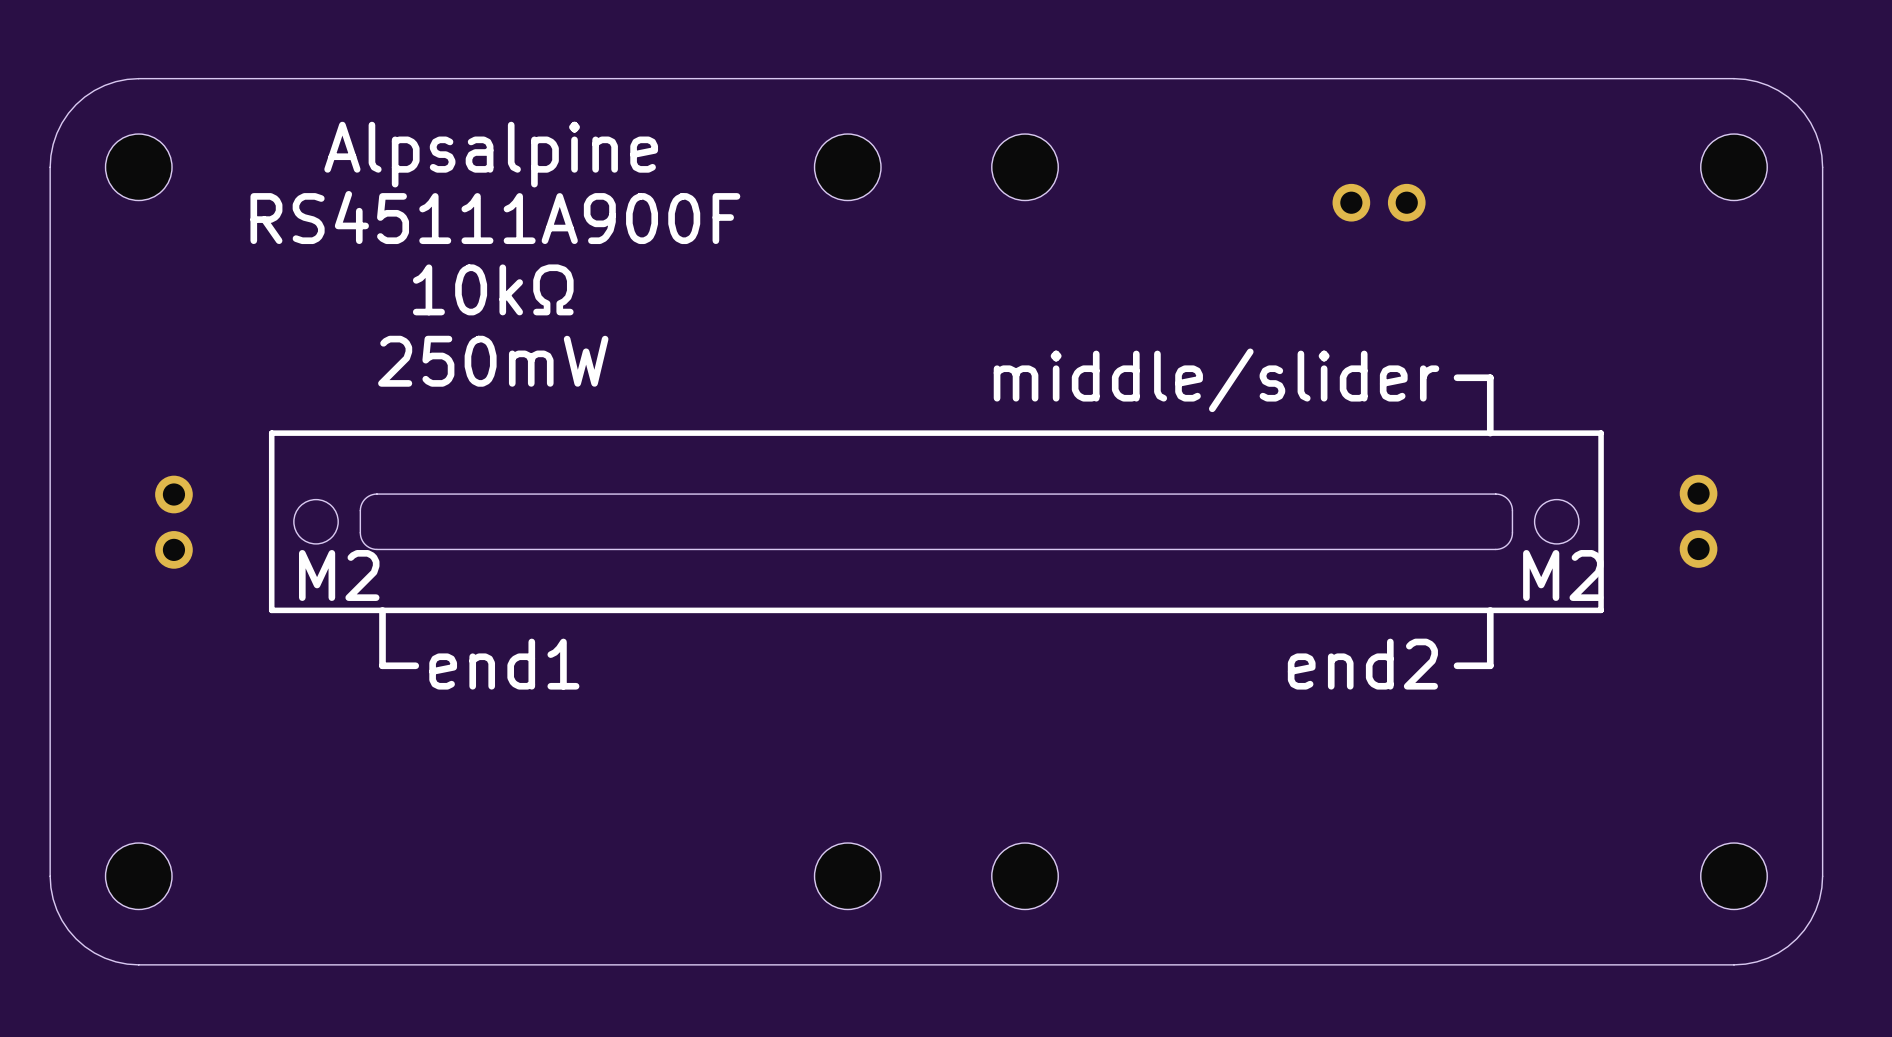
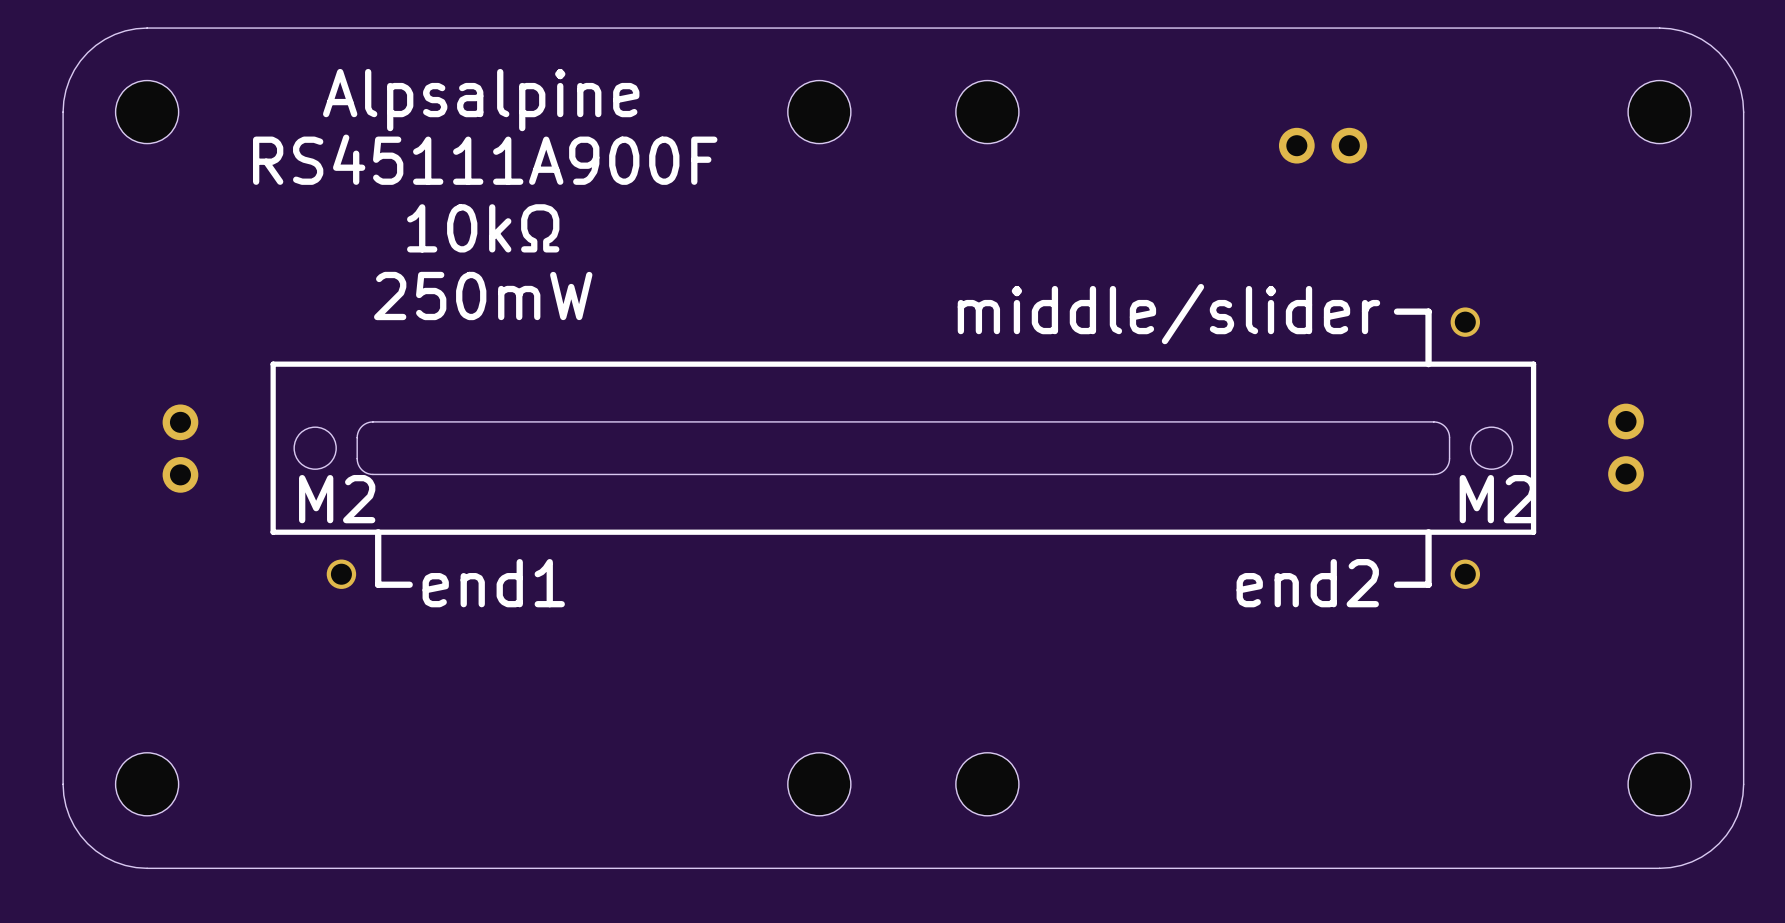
part: none -> (903, 448)

